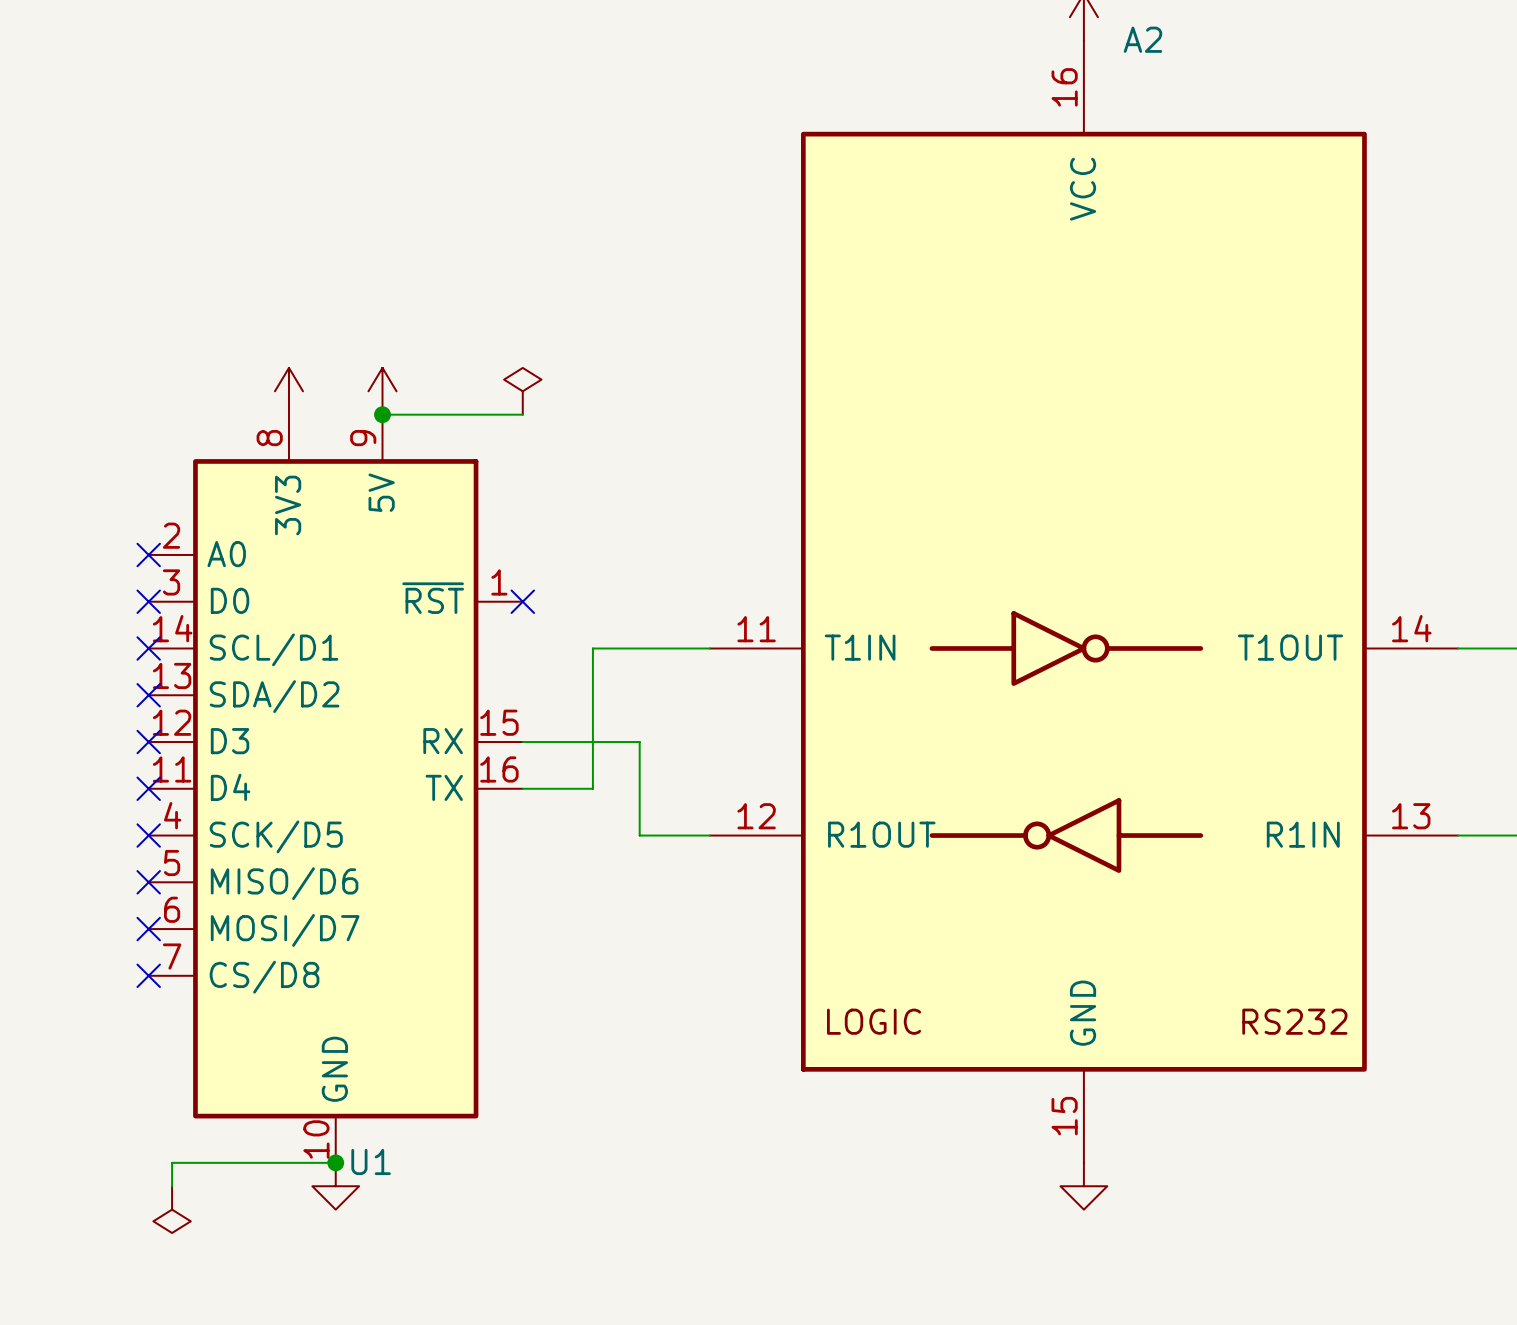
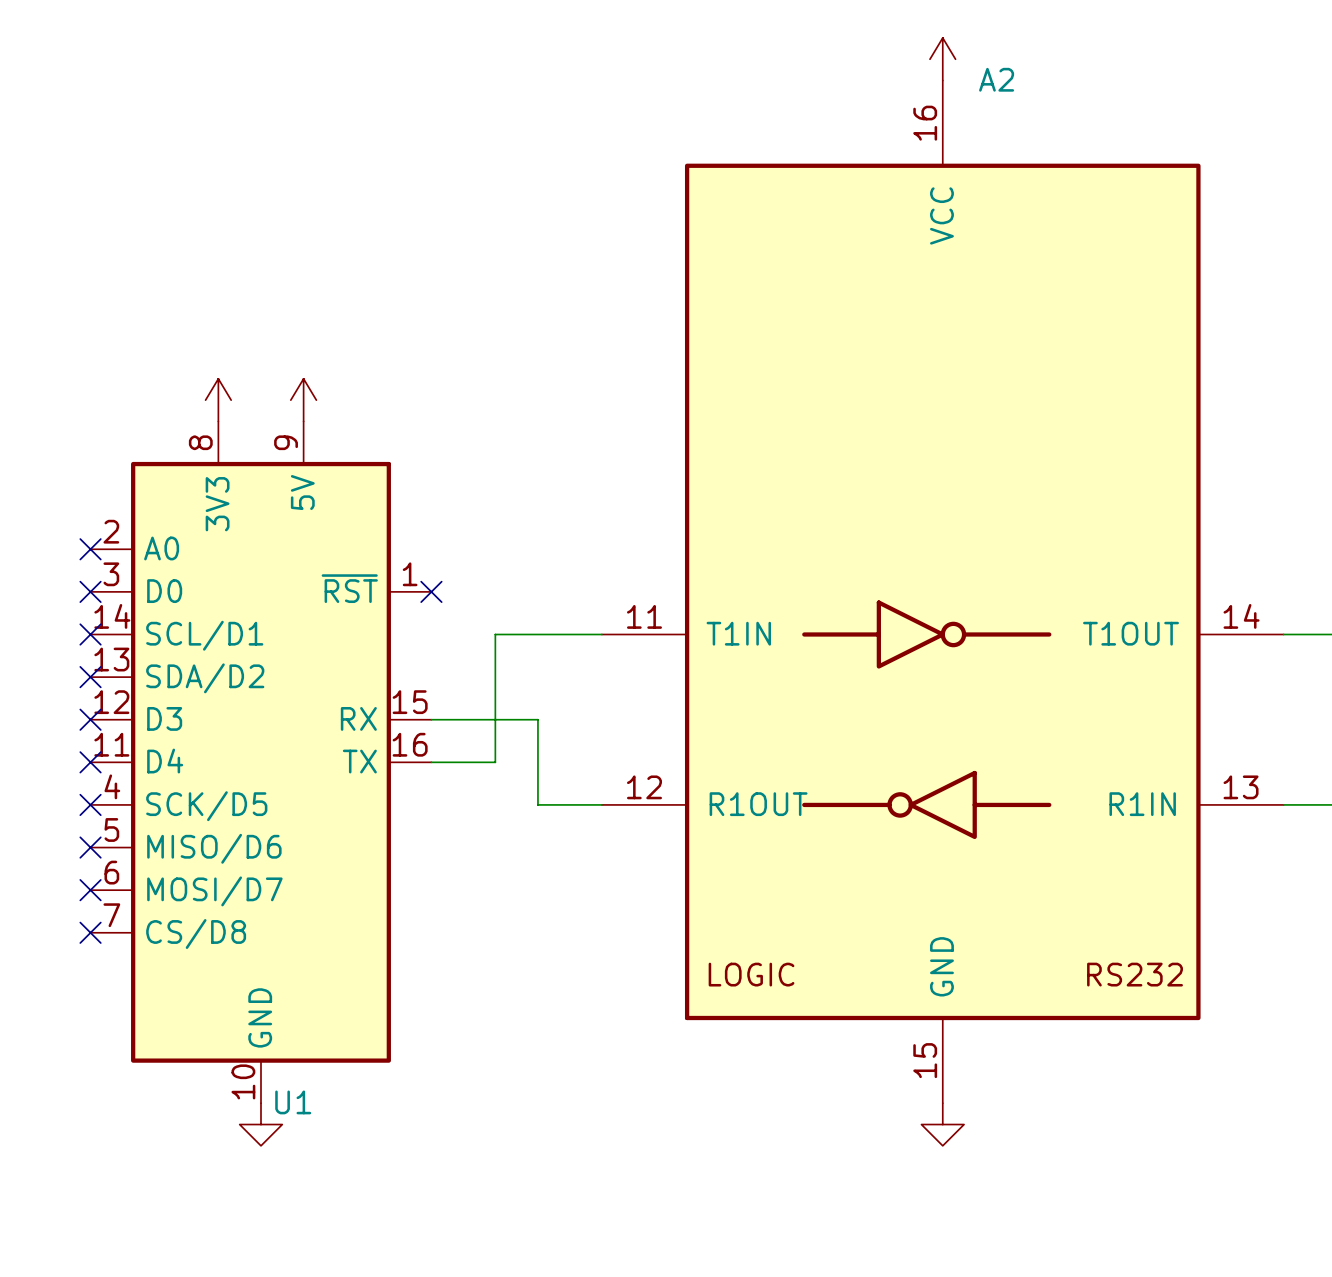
power symbol: (522, 391) -> none
wire: (382, 414) (522, 414) -> none
junction: (382, 414) -> none
wire: (335, 1162) (172, 1162) (172, 1186) -> none
junction: (335, 1162) -> none
power symbol: (172, 1209) -> none

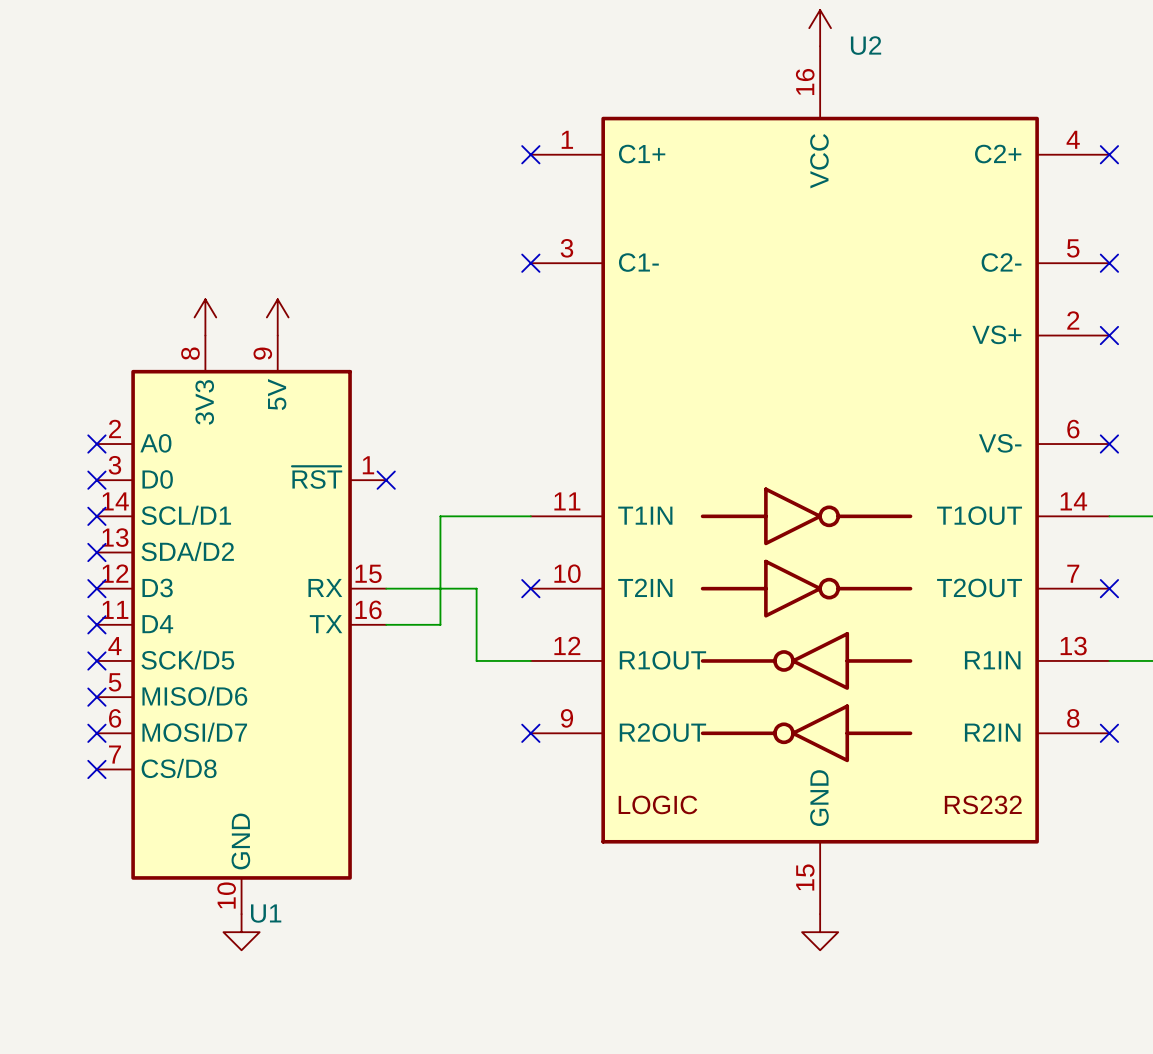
no-connect mark: none -> (530, 154)
no-connect mark: none -> (1109, 154)
no-connect mark: none -> (530, 263)
no-connect mark: none -> (1109, 263)
no-connect mark: none -> (1109, 335)
no-connect mark: none -> (1109, 444)
A2: (942, 591) -> none
U2: none -> (820, 480)
no-connect mark: none -> (530, 588)
no-connect mark: none -> (1109, 588)
no-connect mark: none -> (530, 733)
no-connect mark: none -> (1109, 733)

